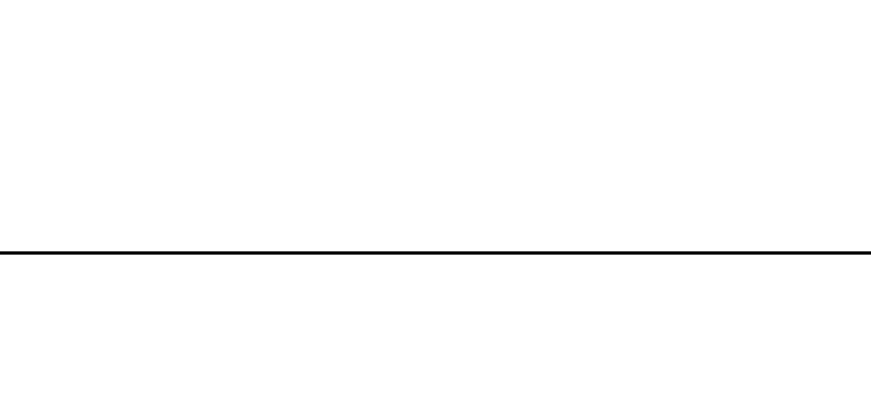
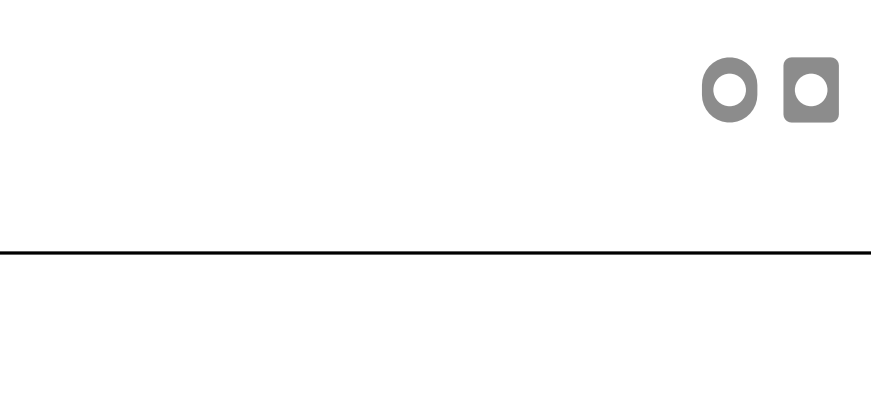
part: none -> (770, 89)

